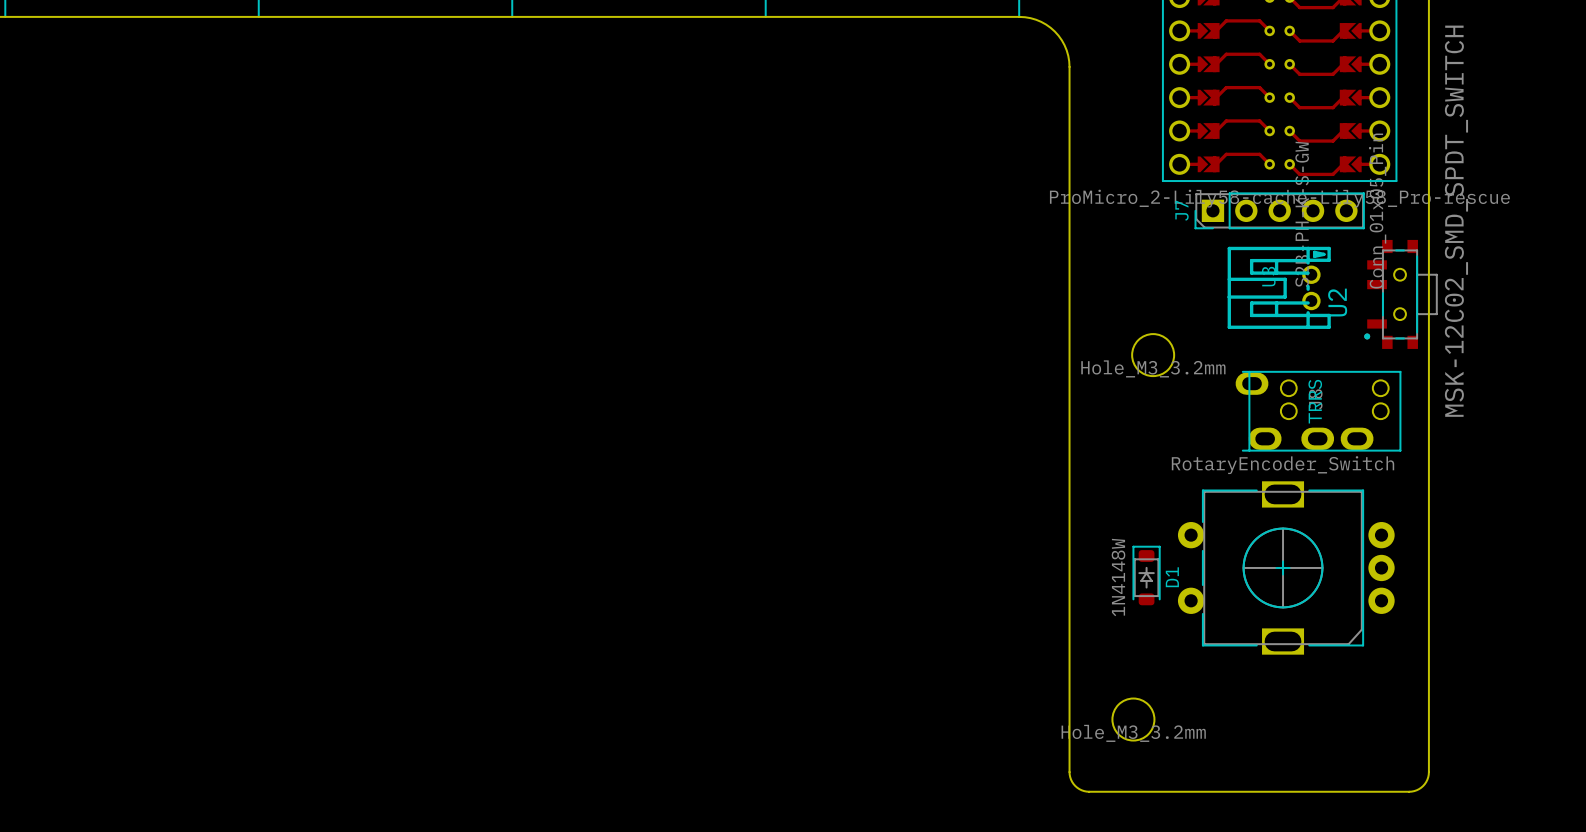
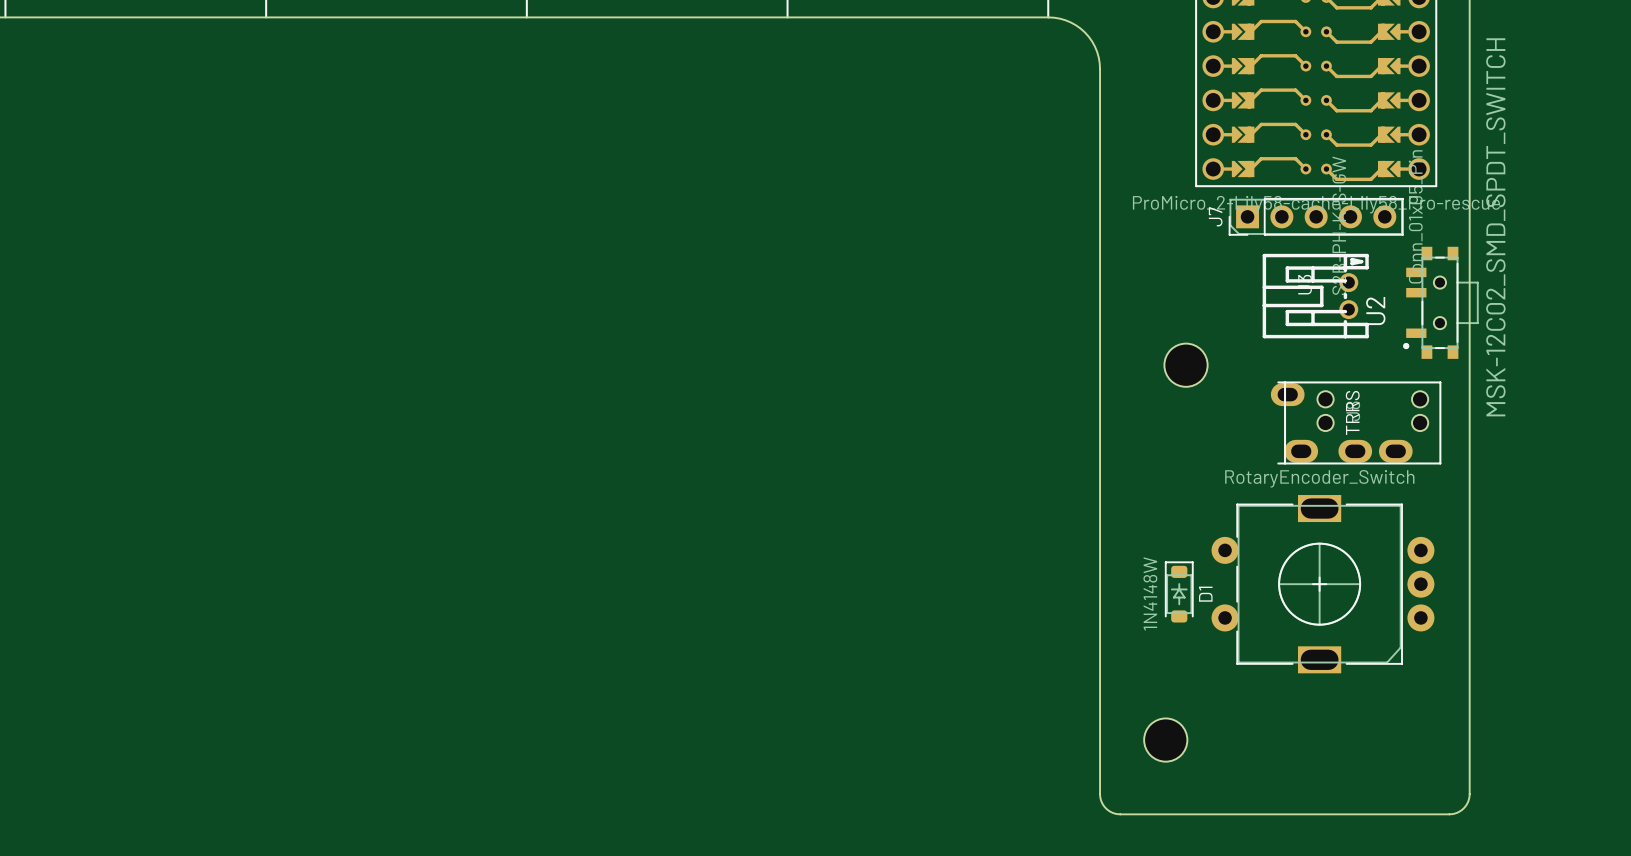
part value: Hole_M3_3.2mm (1153, 368) -> none
part value: Hole_M3_3.2mm (1133, 733) -> none

